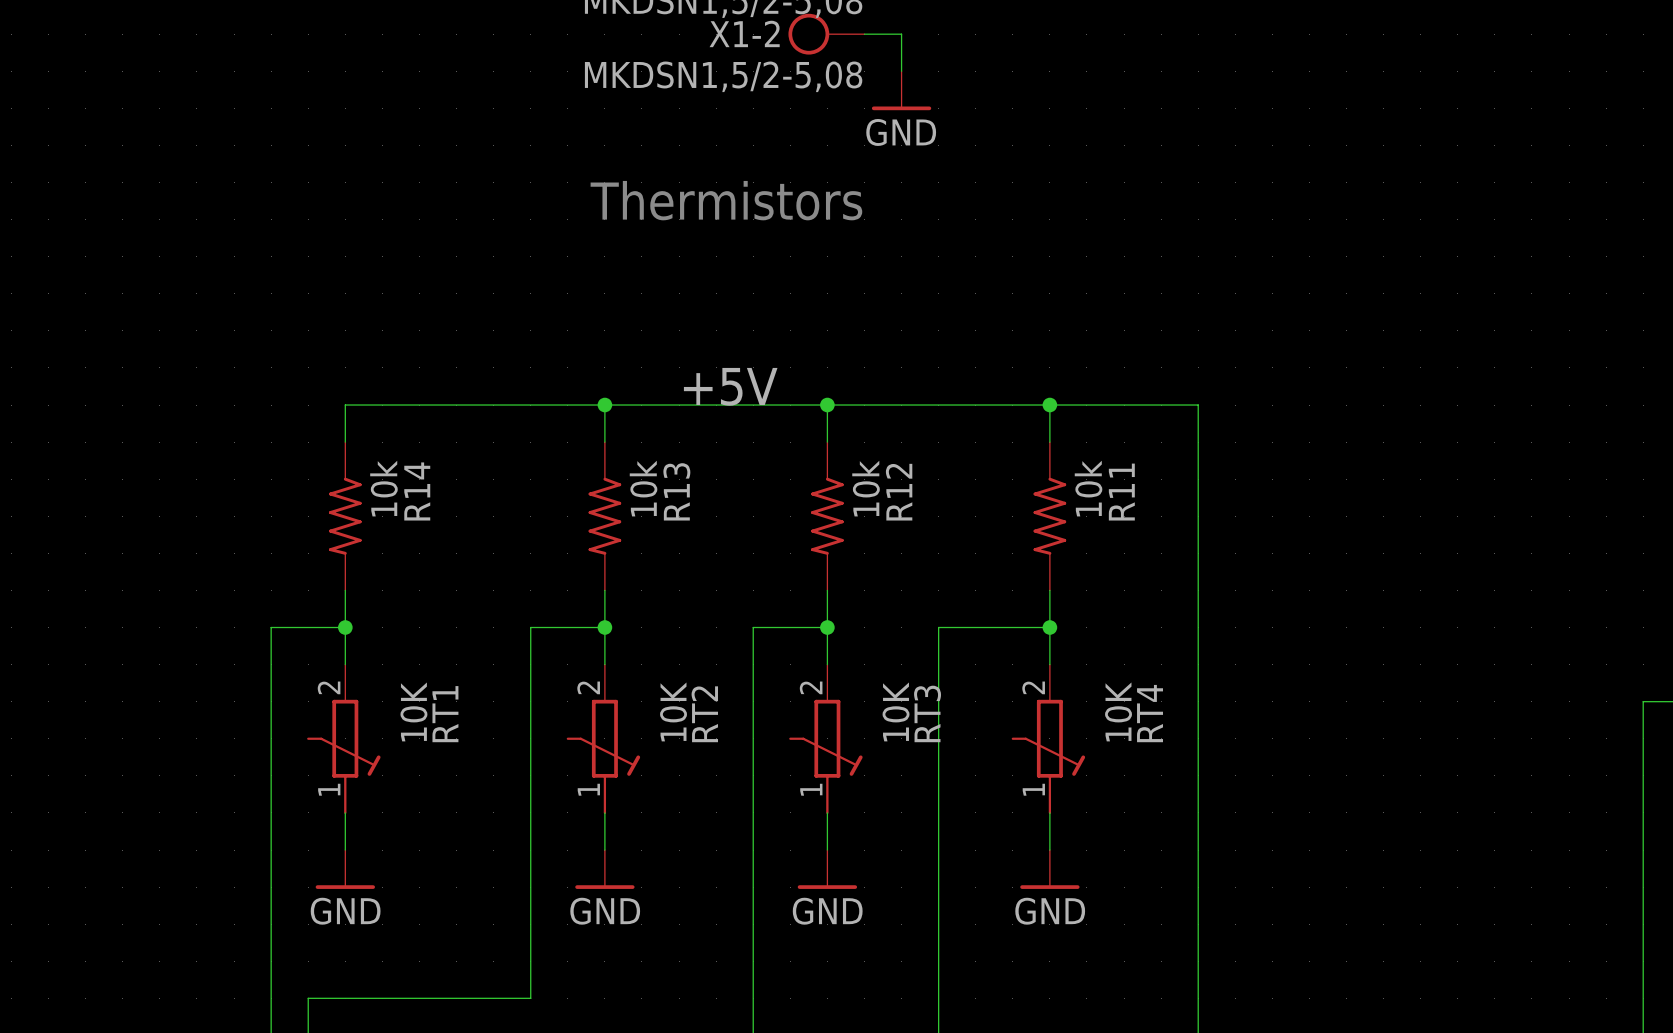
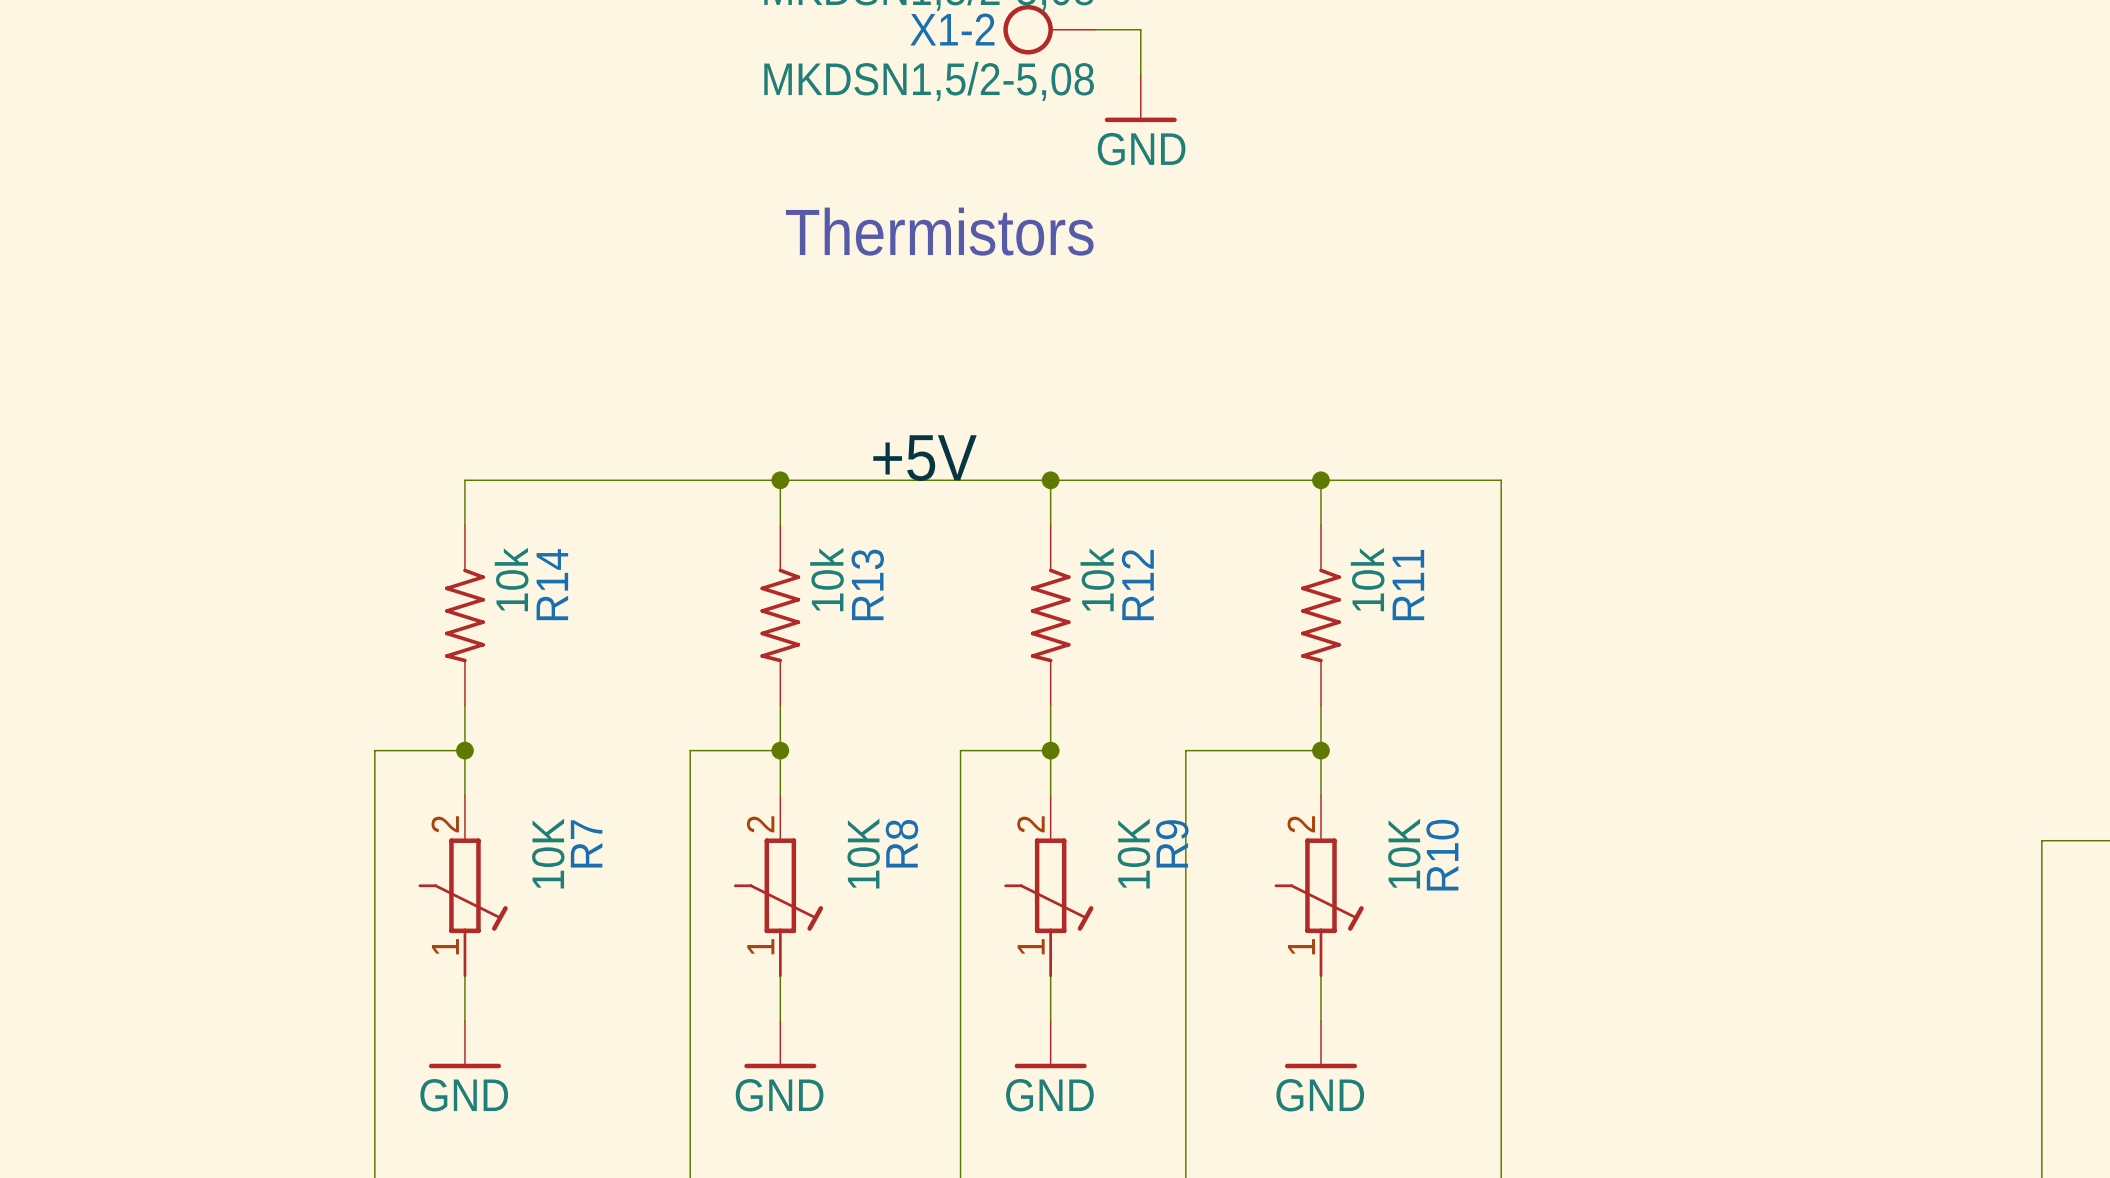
RT3 name: RT3 (927, 713) -> R9 (1172, 843)
RT4 name: RT4 (1150, 713) -> R10 (1442, 855)
RT1 name: RT1 (445, 714) -> R7 (586, 843)
RT2 name: RT2 (704, 714) -> R8 (901, 843)

